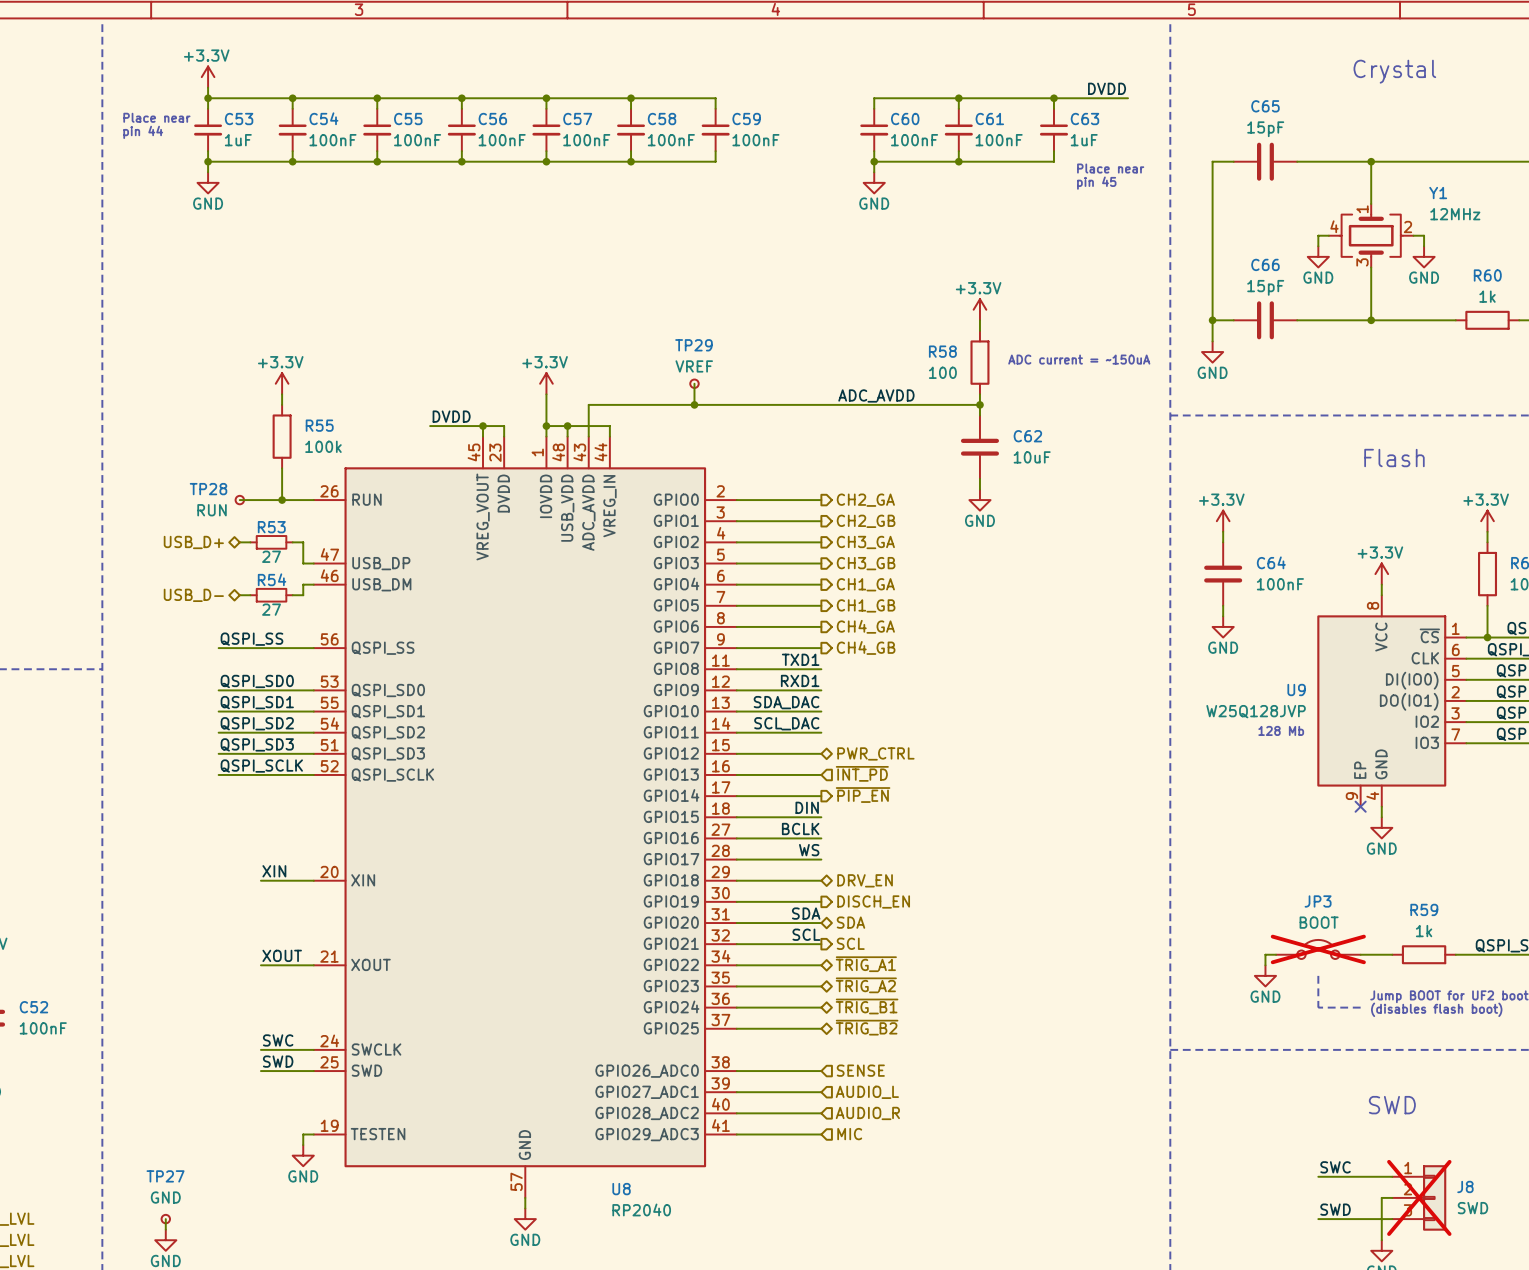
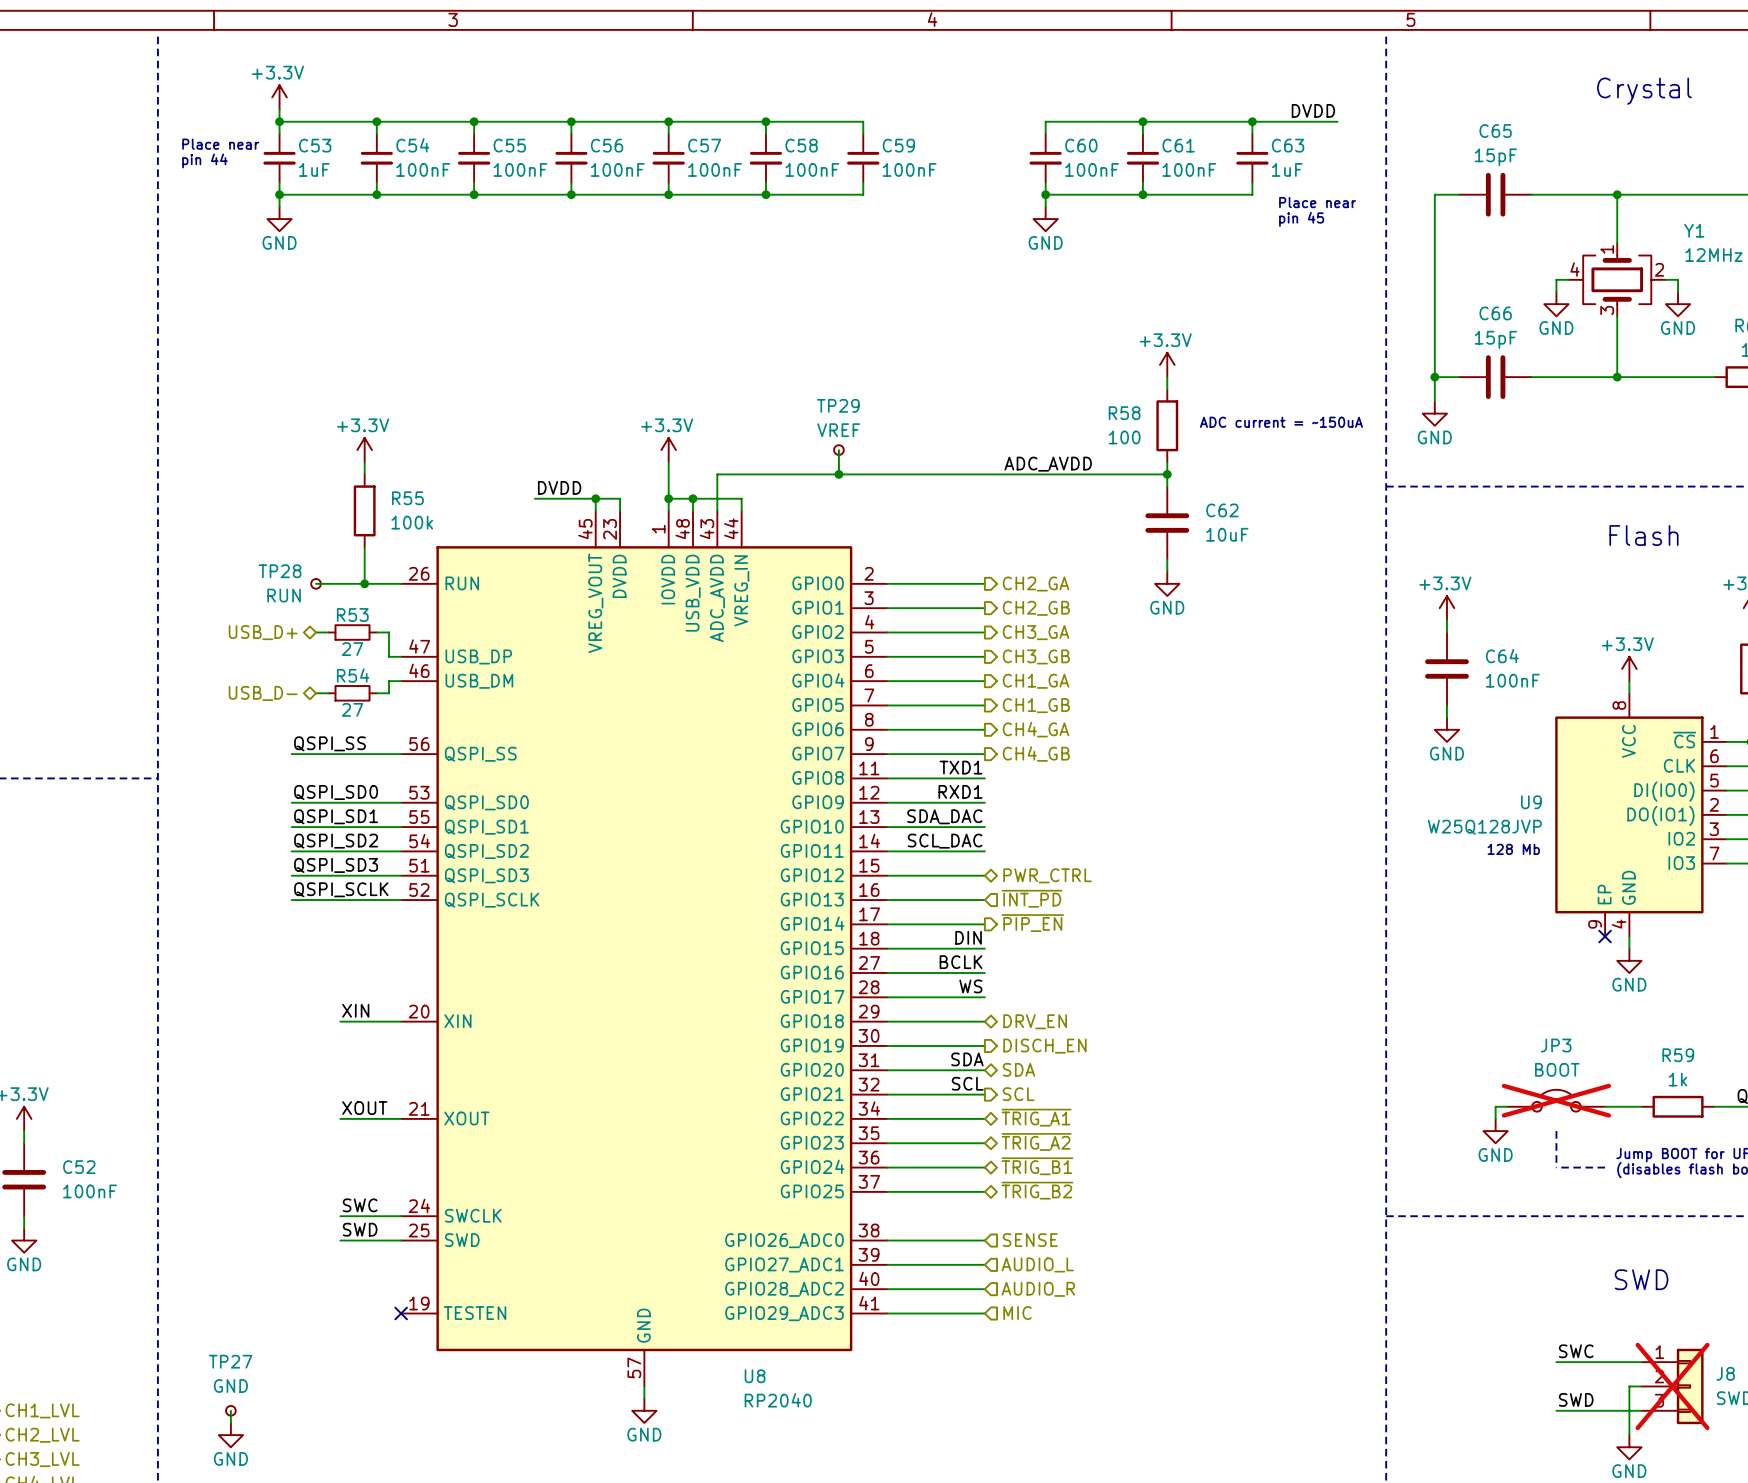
wire: (313, 1134) (303, 1134) (303, 1145) -> none
no-connect mark: none -> (401, 1313)
power symbol: GND (303, 1155) -> none

